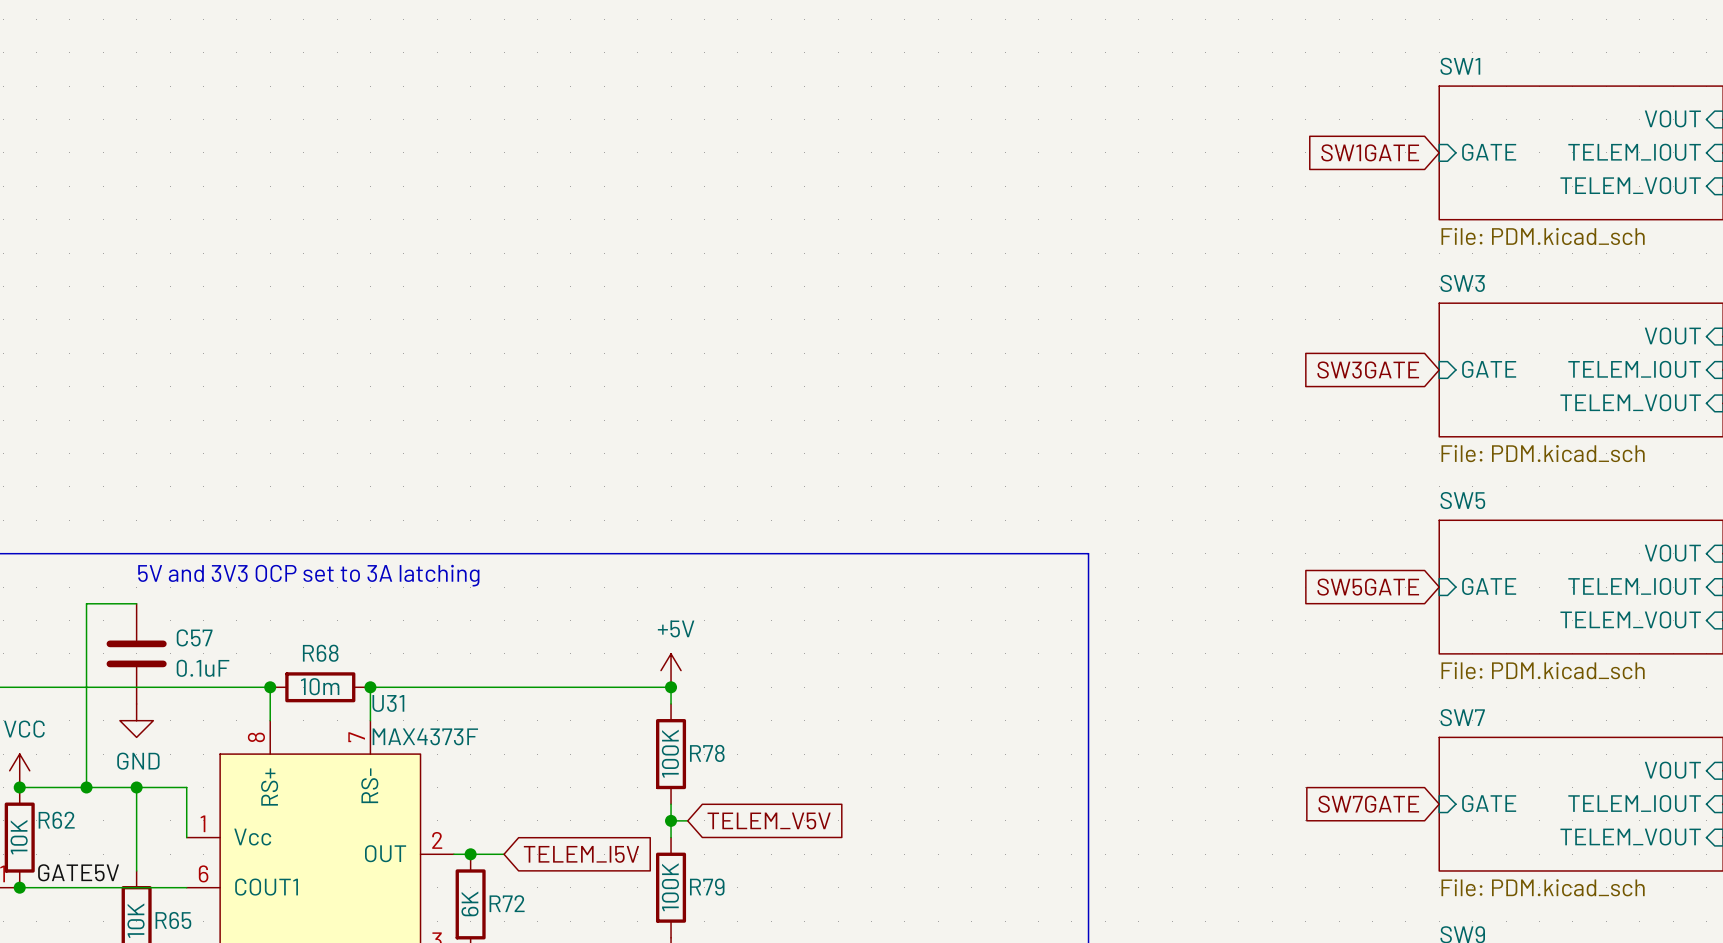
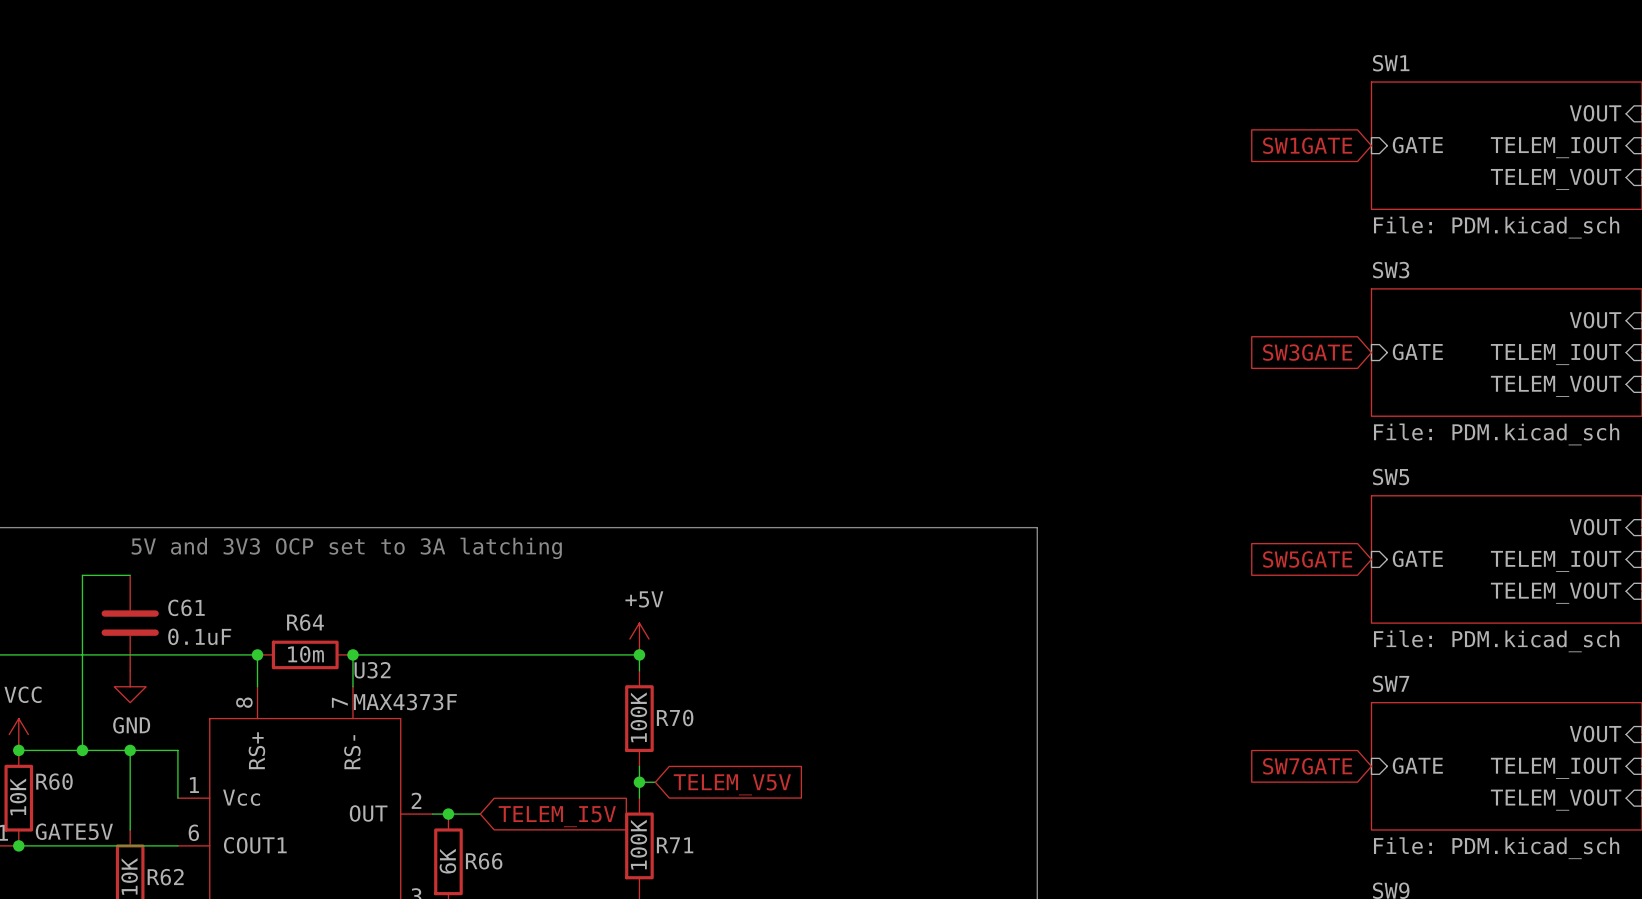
C57 name: C57 (194, 637) -> C61 (186, 607)
R68 name: R68 (320, 653) -> R64 (305, 622)
U31 name: U31 (388, 703) -> U32 (372, 670)
R78 name: R78 (707, 753) -> R70 (675, 718)
R62 name: R62 (56, 820) -> R60 (54, 781)
R79 name: R79 (707, 887) -> R71 (675, 845)
R72 name: R72 (507, 903) -> R66 (484, 861)
R65 name: R65 (173, 920) -> R62 (165, 877)

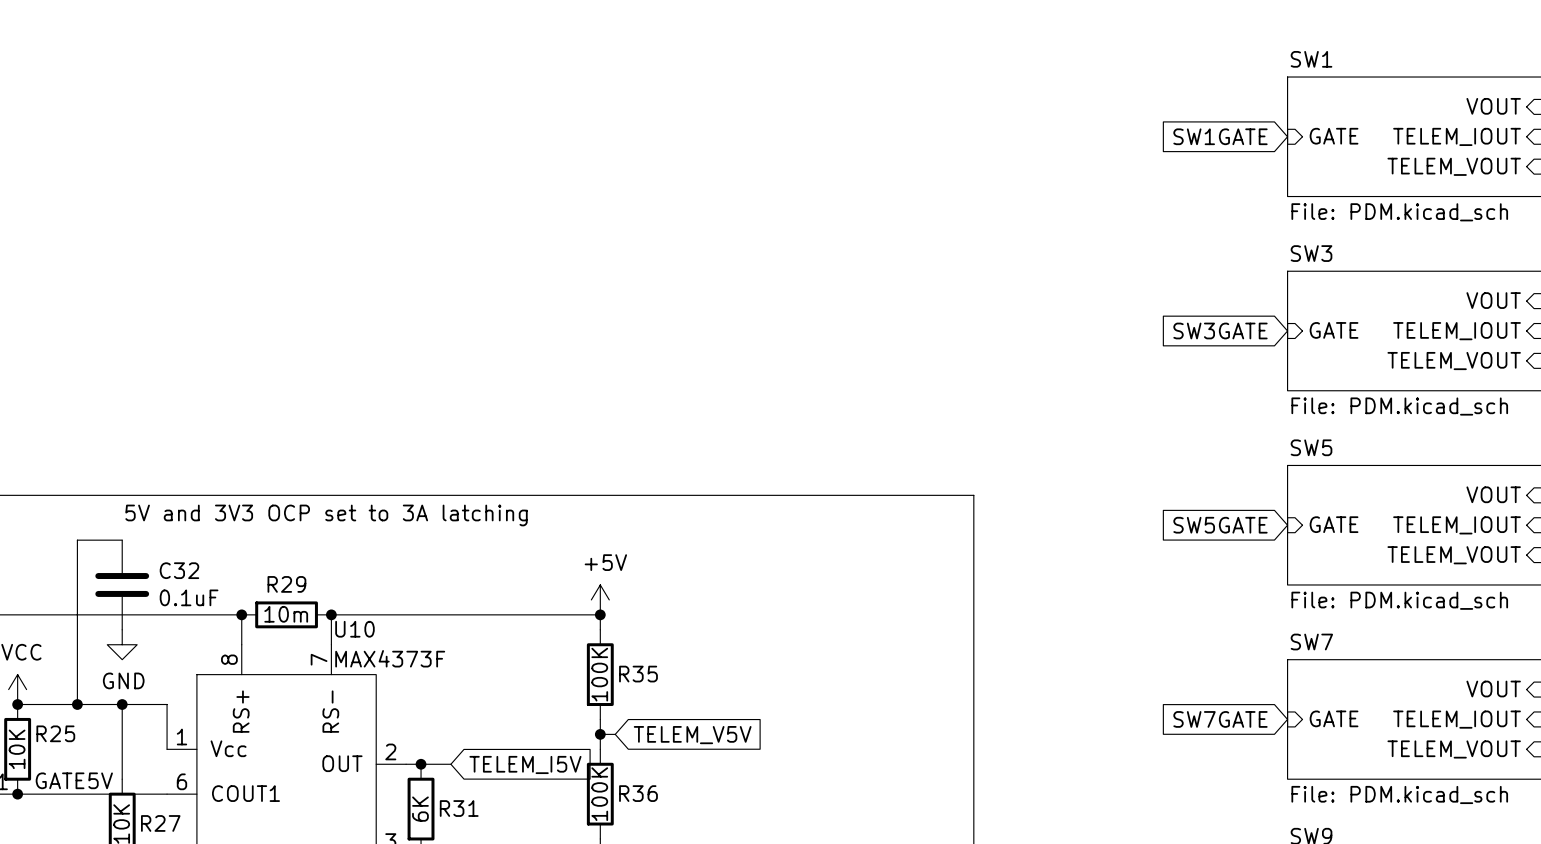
C61 name: C61 (186, 607) -> C32 (179, 570)
R64 name: R64 (305, 622) -> R29 (286, 584)
U32 name: U32 (372, 670) -> U10 (354, 629)
R70 name: R70 (675, 718) -> R35 (638, 674)
R60 name: R60 (54, 781) -> R25 (55, 733)
R71 name: R71 (675, 845) -> R36 (638, 793)
R66 name: R66 (484, 861) -> R31 (459, 808)
R62 name: R62 (165, 877) -> R27 (160, 823)

